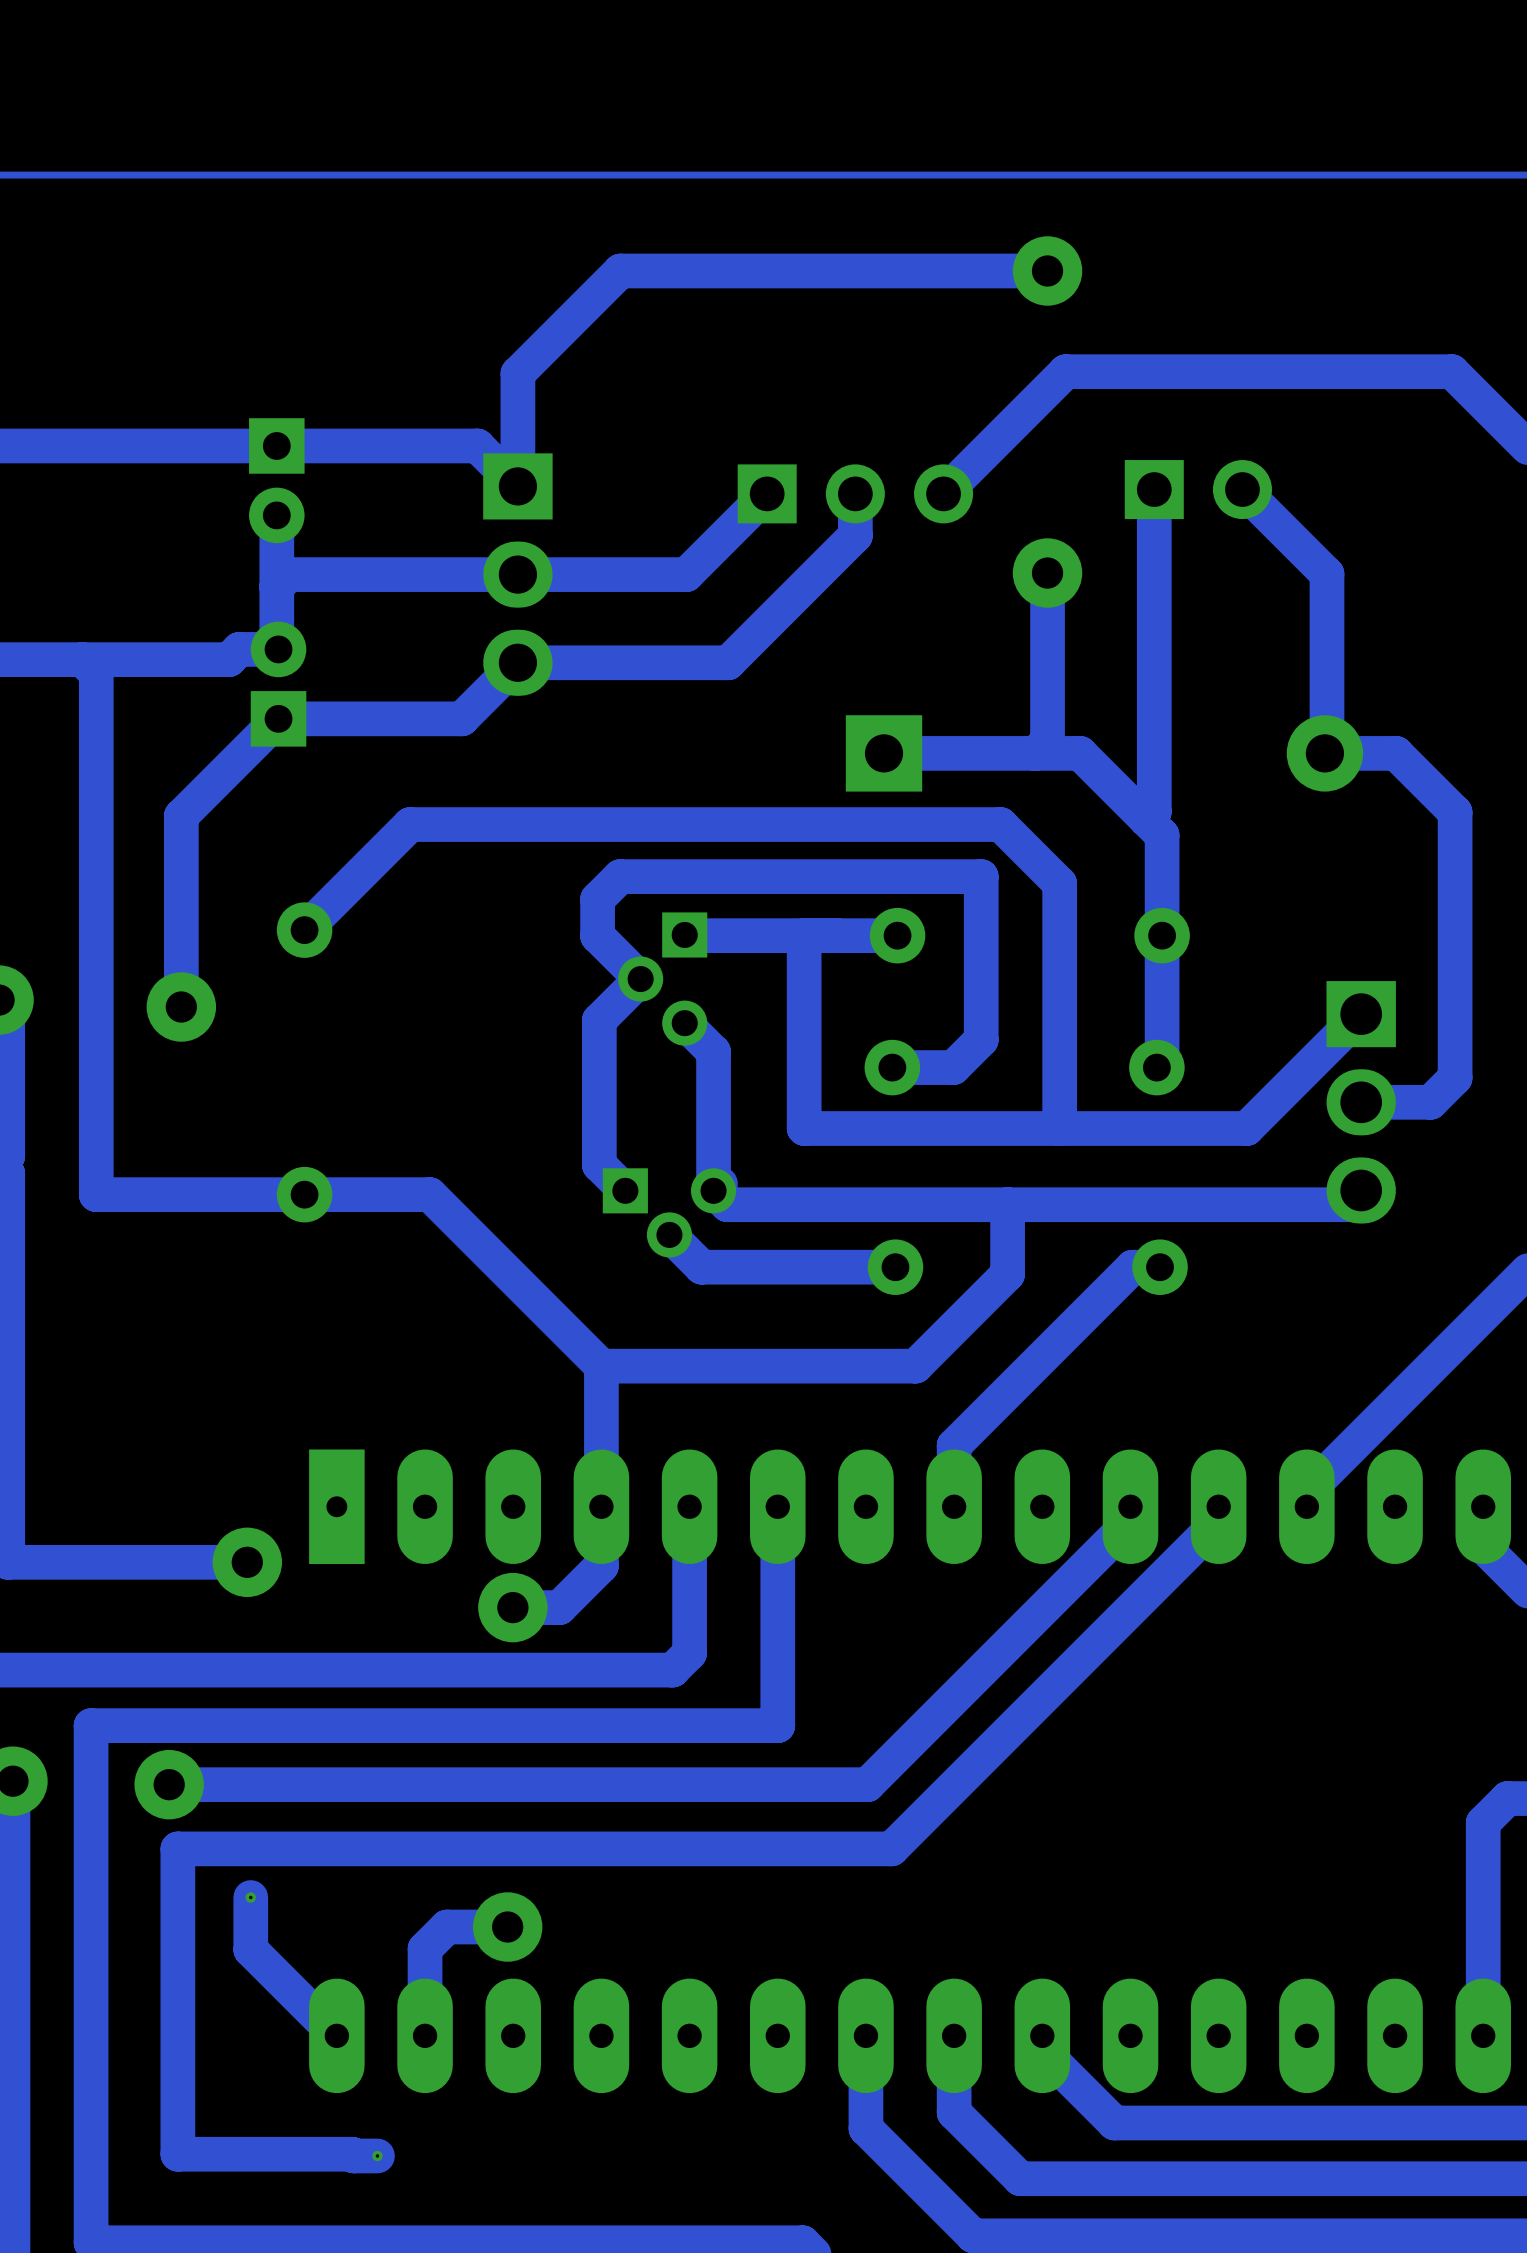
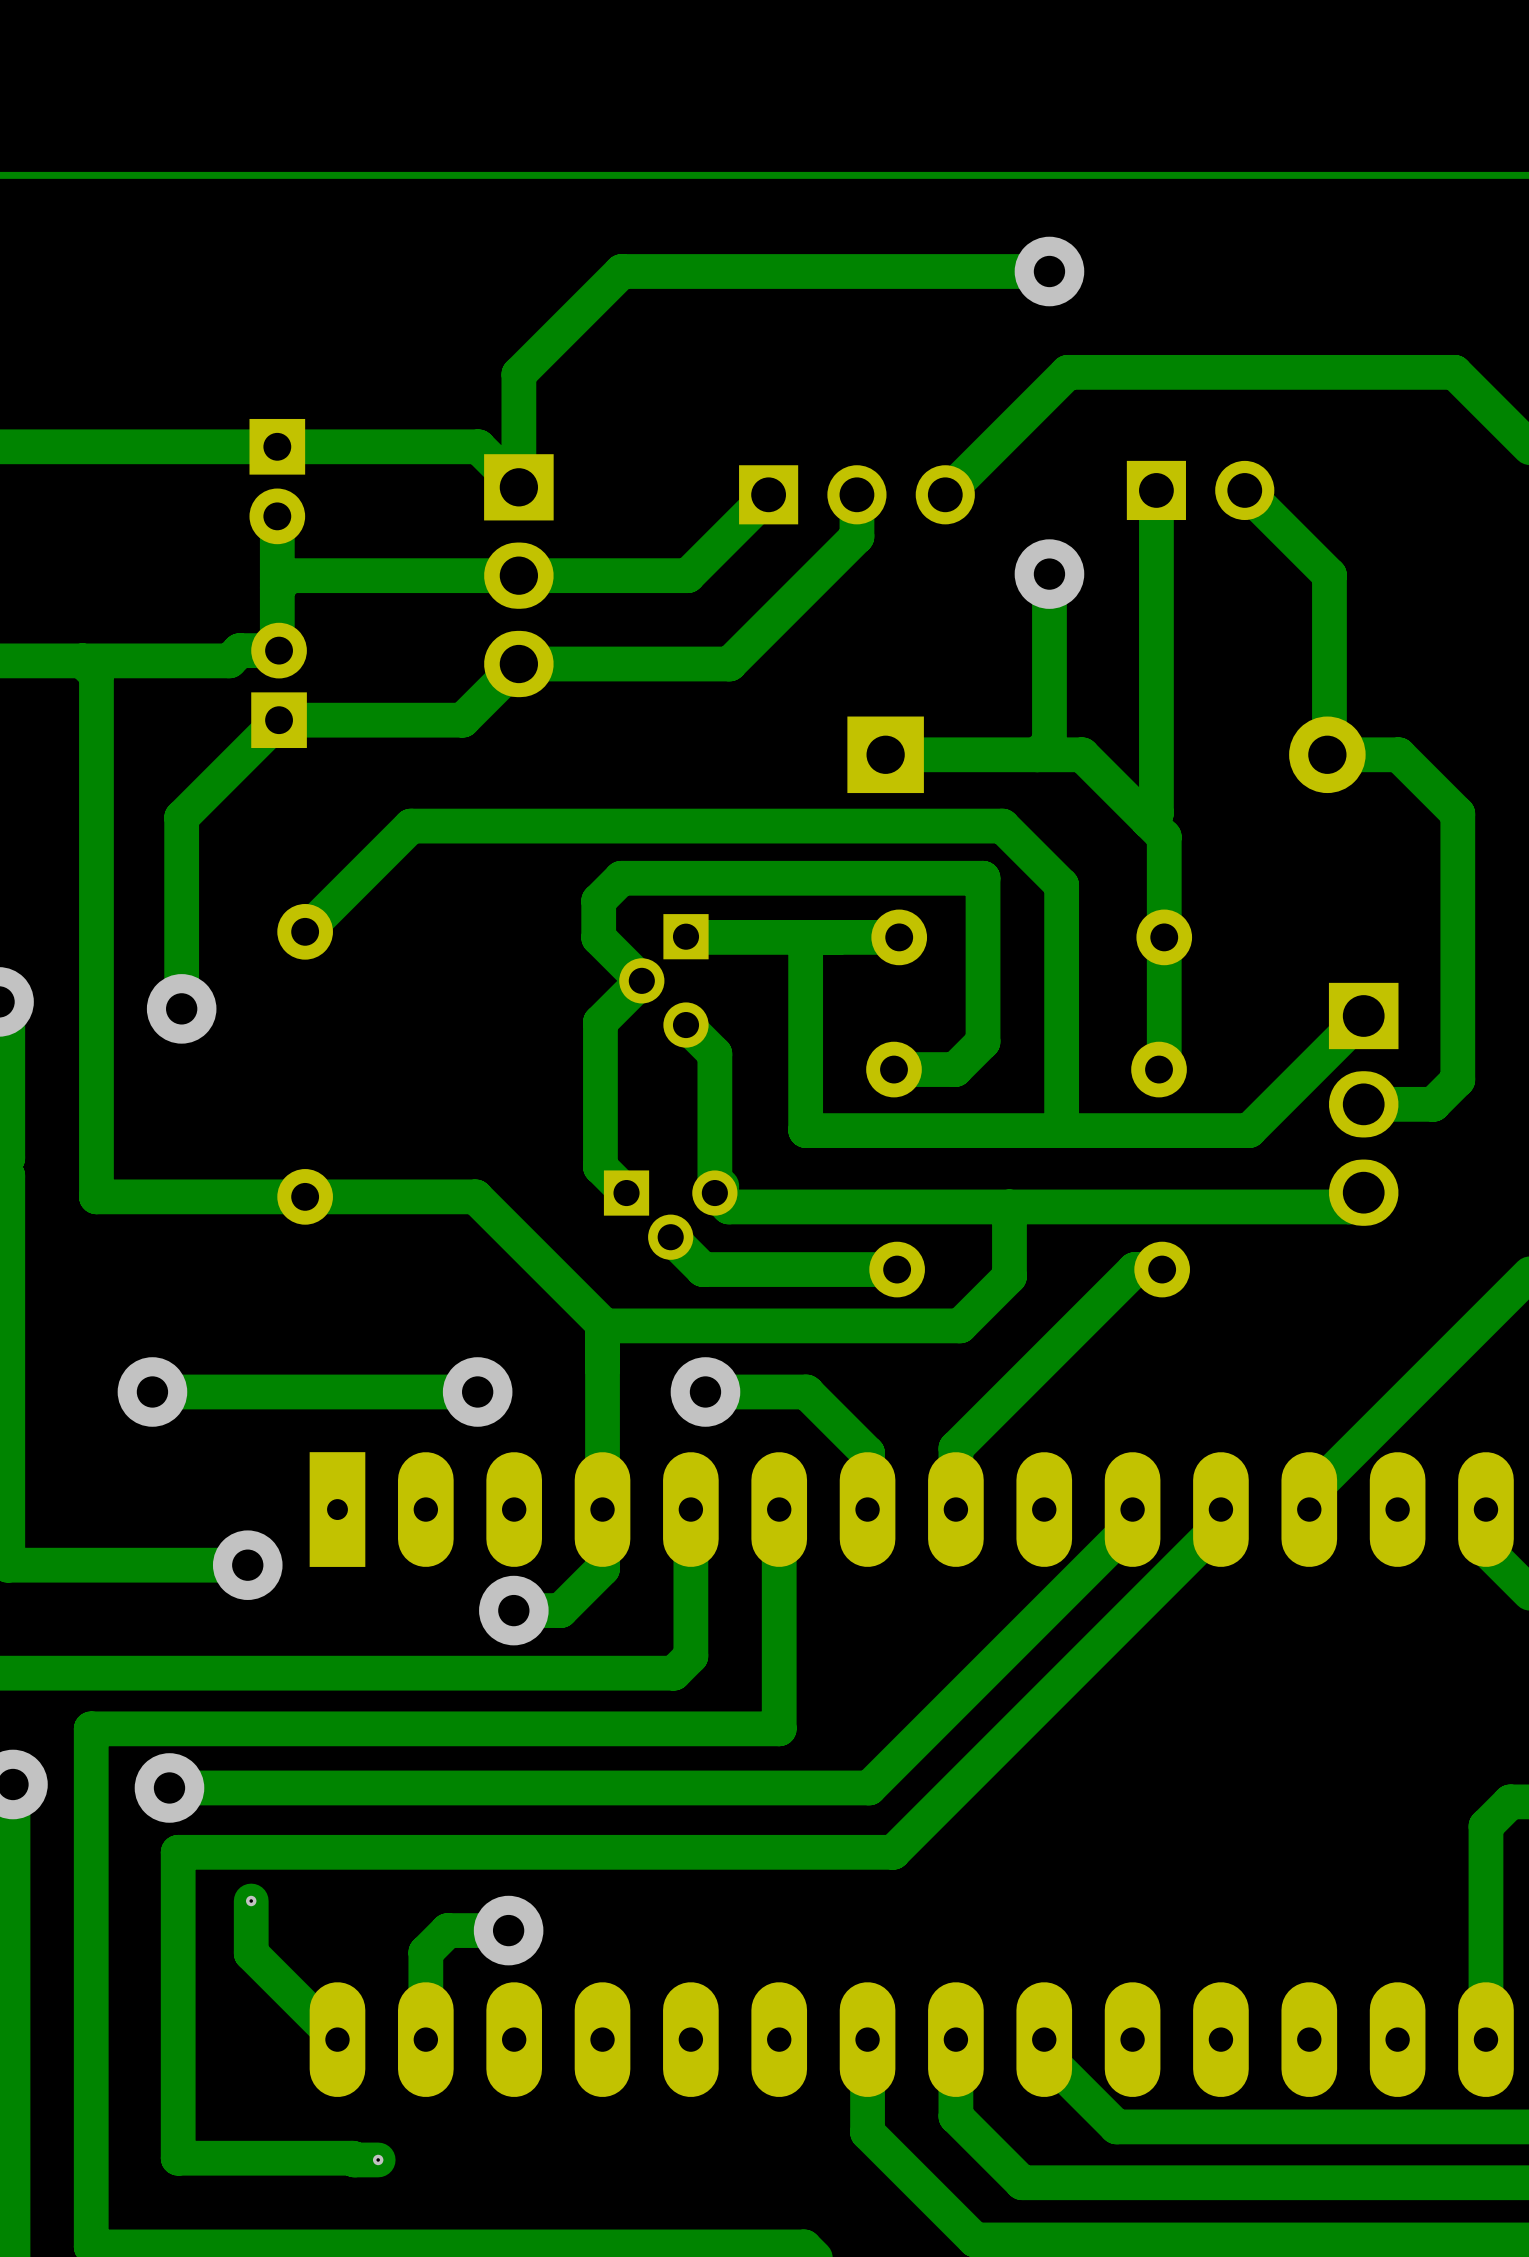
track: (429, 1194) (601, 1366) (915, 1366) (958, 1323) -> (602, 1325) (960, 1325)
track: none -> (430, 1196) (475, 1196) (602, 1323) (602, 1368)
via: none -> (152, 1391)
track: none -> (477, 1391) (152, 1391)
via: none -> (477, 1391)
track: none -> (705, 1391) (806, 1391) (867, 1453) (867, 1509)
via: none -> (705, 1391)

